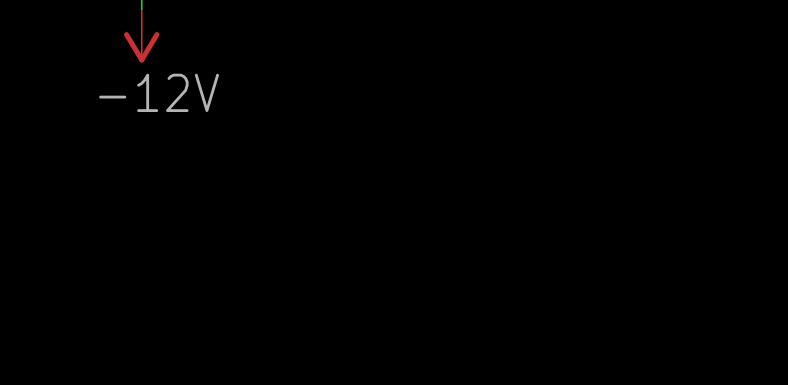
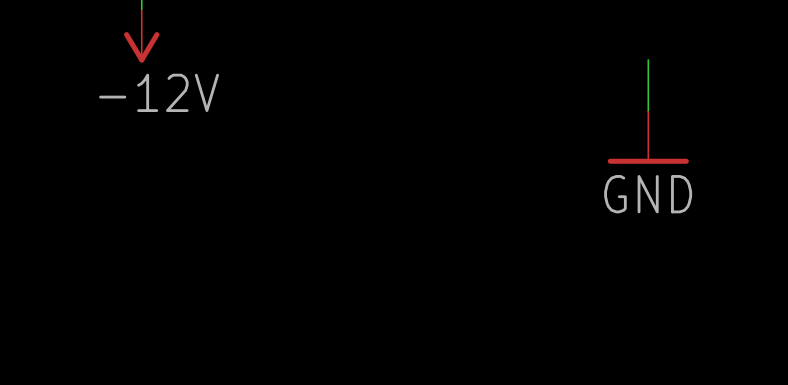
wire: none -> (648, 59) (648, 110)
power symbol: none -> GND (648, 137)

